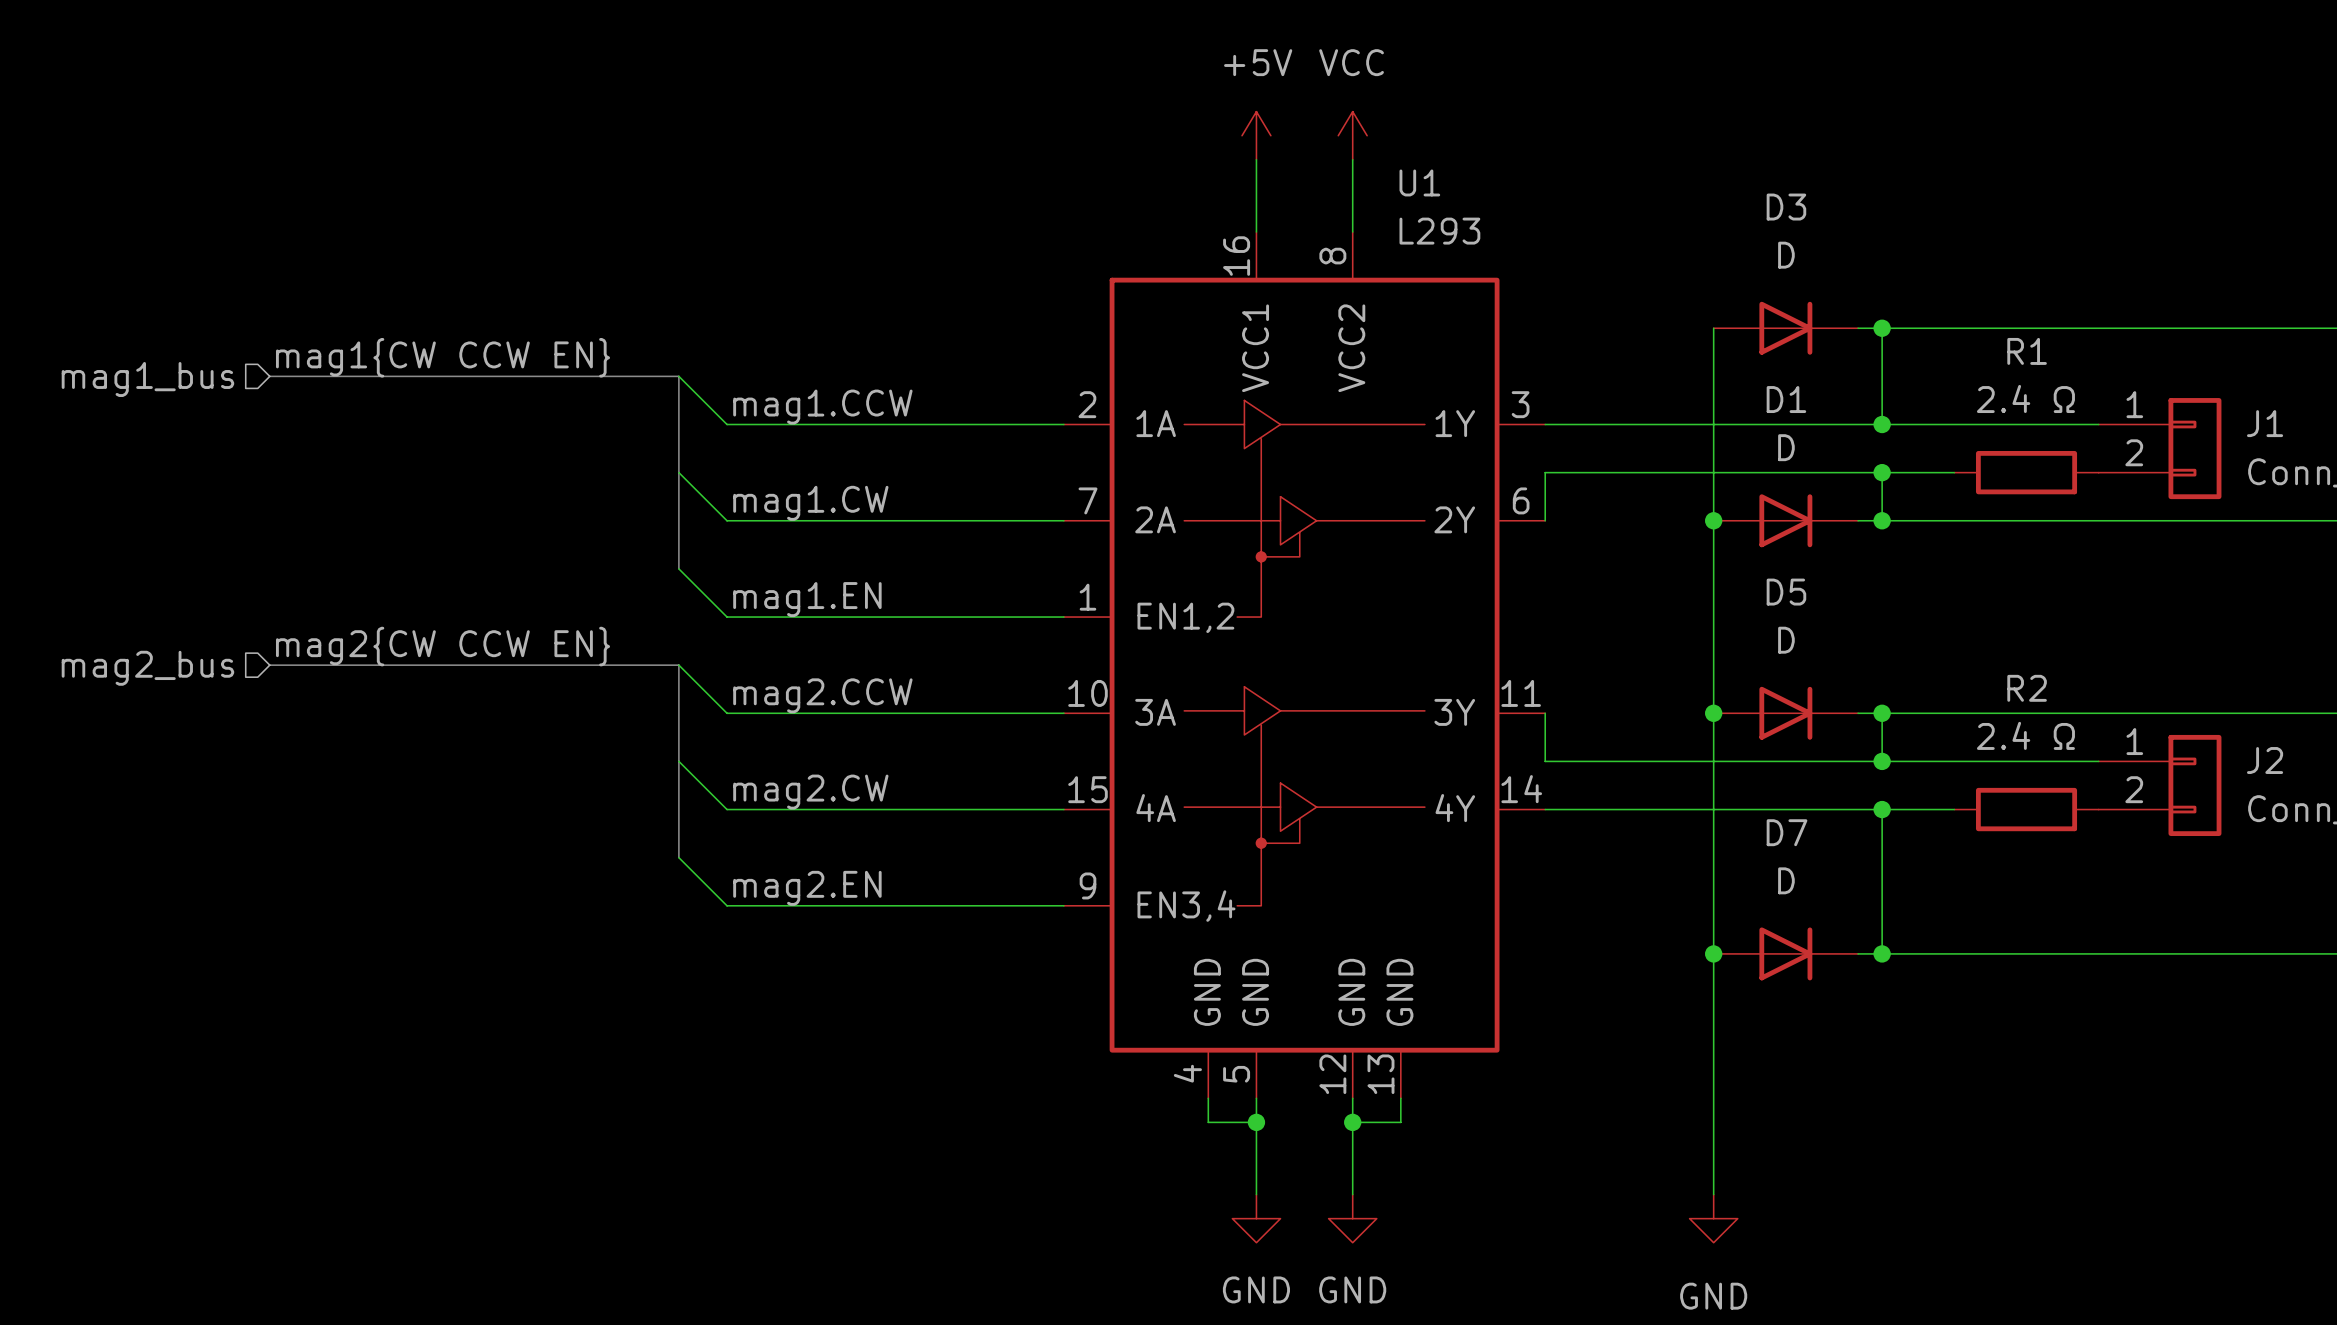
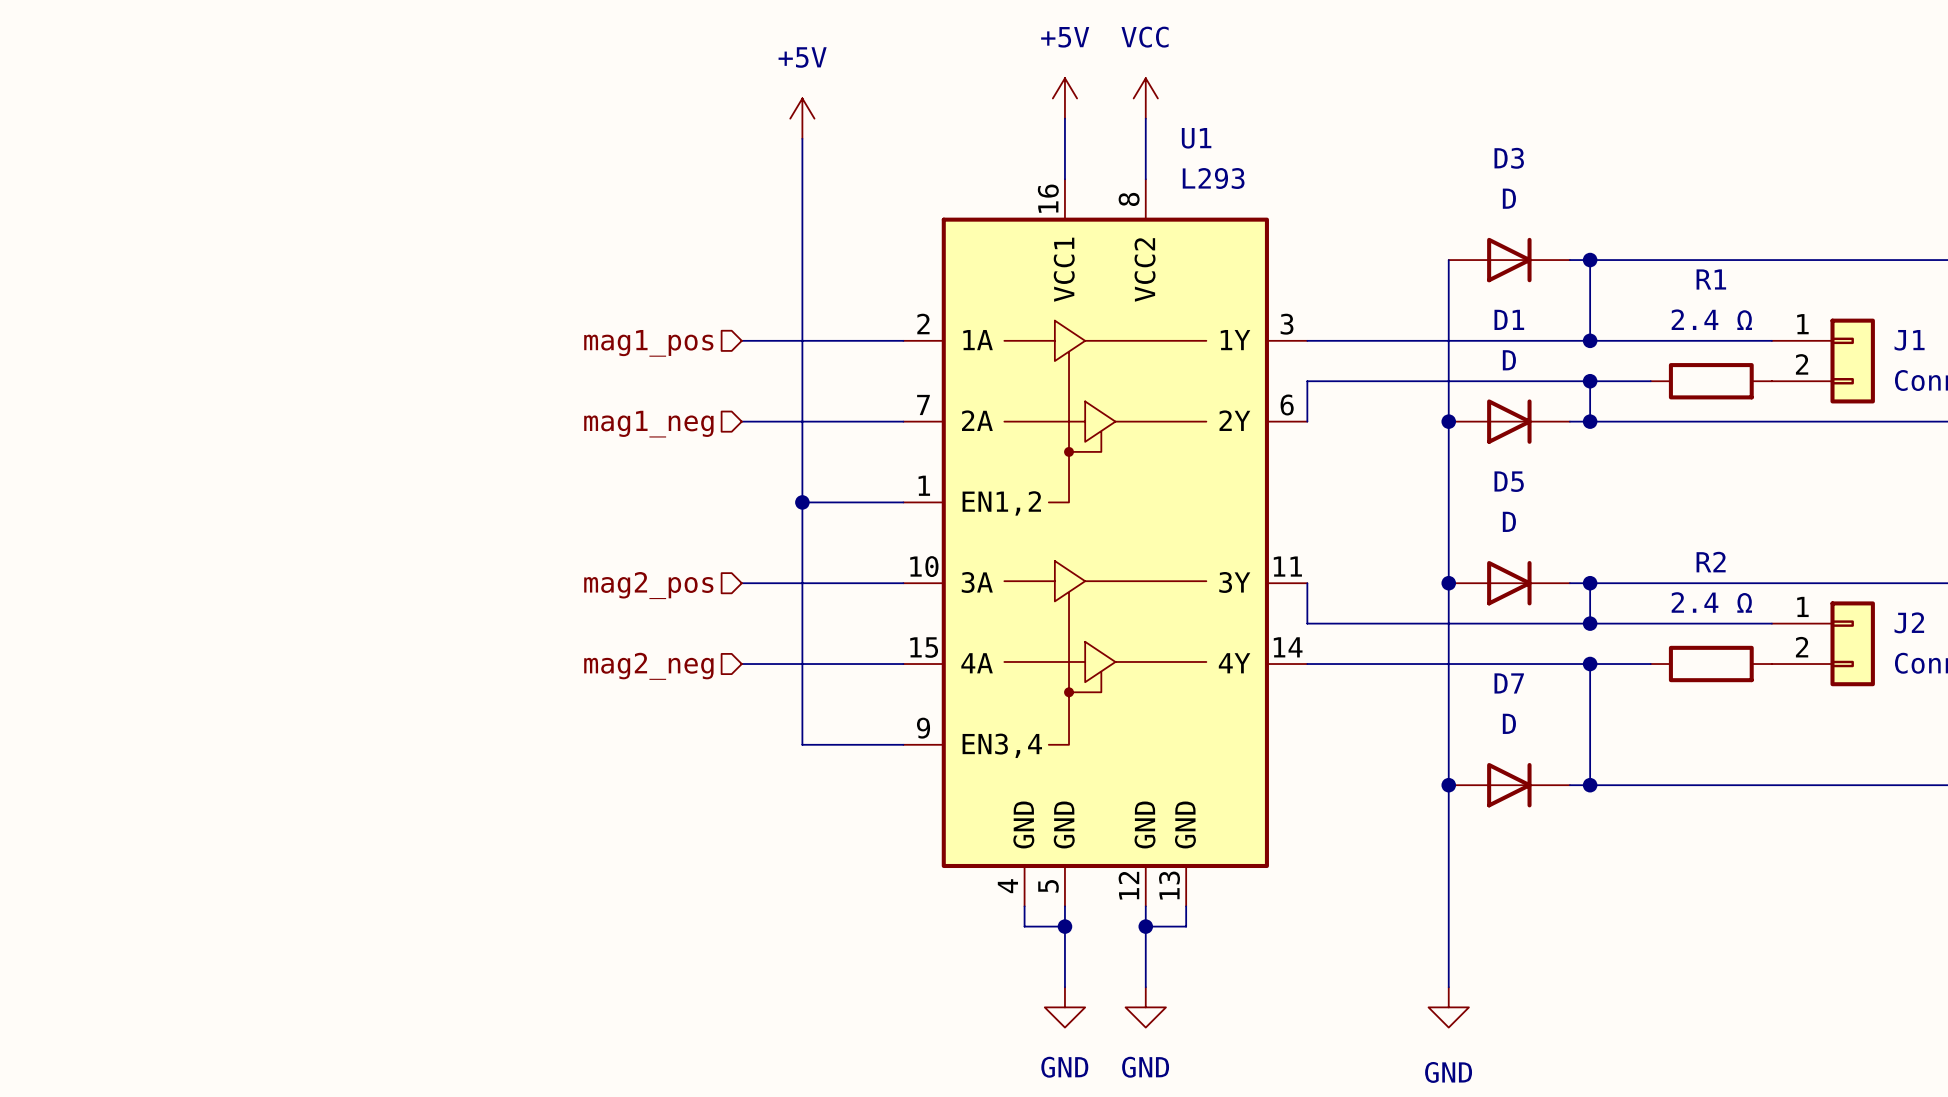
power symbol: none -> +5V (802, 118)
label: mag1{CW CCW EN} (443, 357) -> none
bus: (269, 376) (678, 376) (678, 568) -> none
wire: (678, 376) (727, 424) (871, 424) -> none
hierarchical label: mag1_bus (147, 379) -> none
label: mag1.CCW (822, 407) -> none
hierarchical label: none -> mag1_pos (648, 343)
wire: (678, 472) (727, 520) (871, 520) -> none
label: mag1.CW (810, 503) -> none
hierarchical label: none -> mag1_neg (648, 424)
wire: (678, 568) (727, 617) (943, 617) -> none
label: mag1.EN (807, 599) -> none
junction: none -> (802, 502)
label: mag2{CW CCW EN} (443, 646) -> none
bus: (269, 665) (678, 665) (678, 857) -> none
wire: (678, 665) (727, 713) (871, 713) -> none
hierarchical label: mag2_bus (147, 668) -> none
label: mag2.CCW (822, 695) -> none
hierarchical label: none -> mag2_pos (648, 585)
wire: (678, 761) (727, 809) (871, 809) -> none
label: mag2.CW (810, 792) -> none
hierarchical label: none -> mag2_neg (648, 666)
wire: (678, 857) (727, 905) (943, 905) -> (802, 138) (802, 744)
label: mag2.EN (807, 888) -> none

